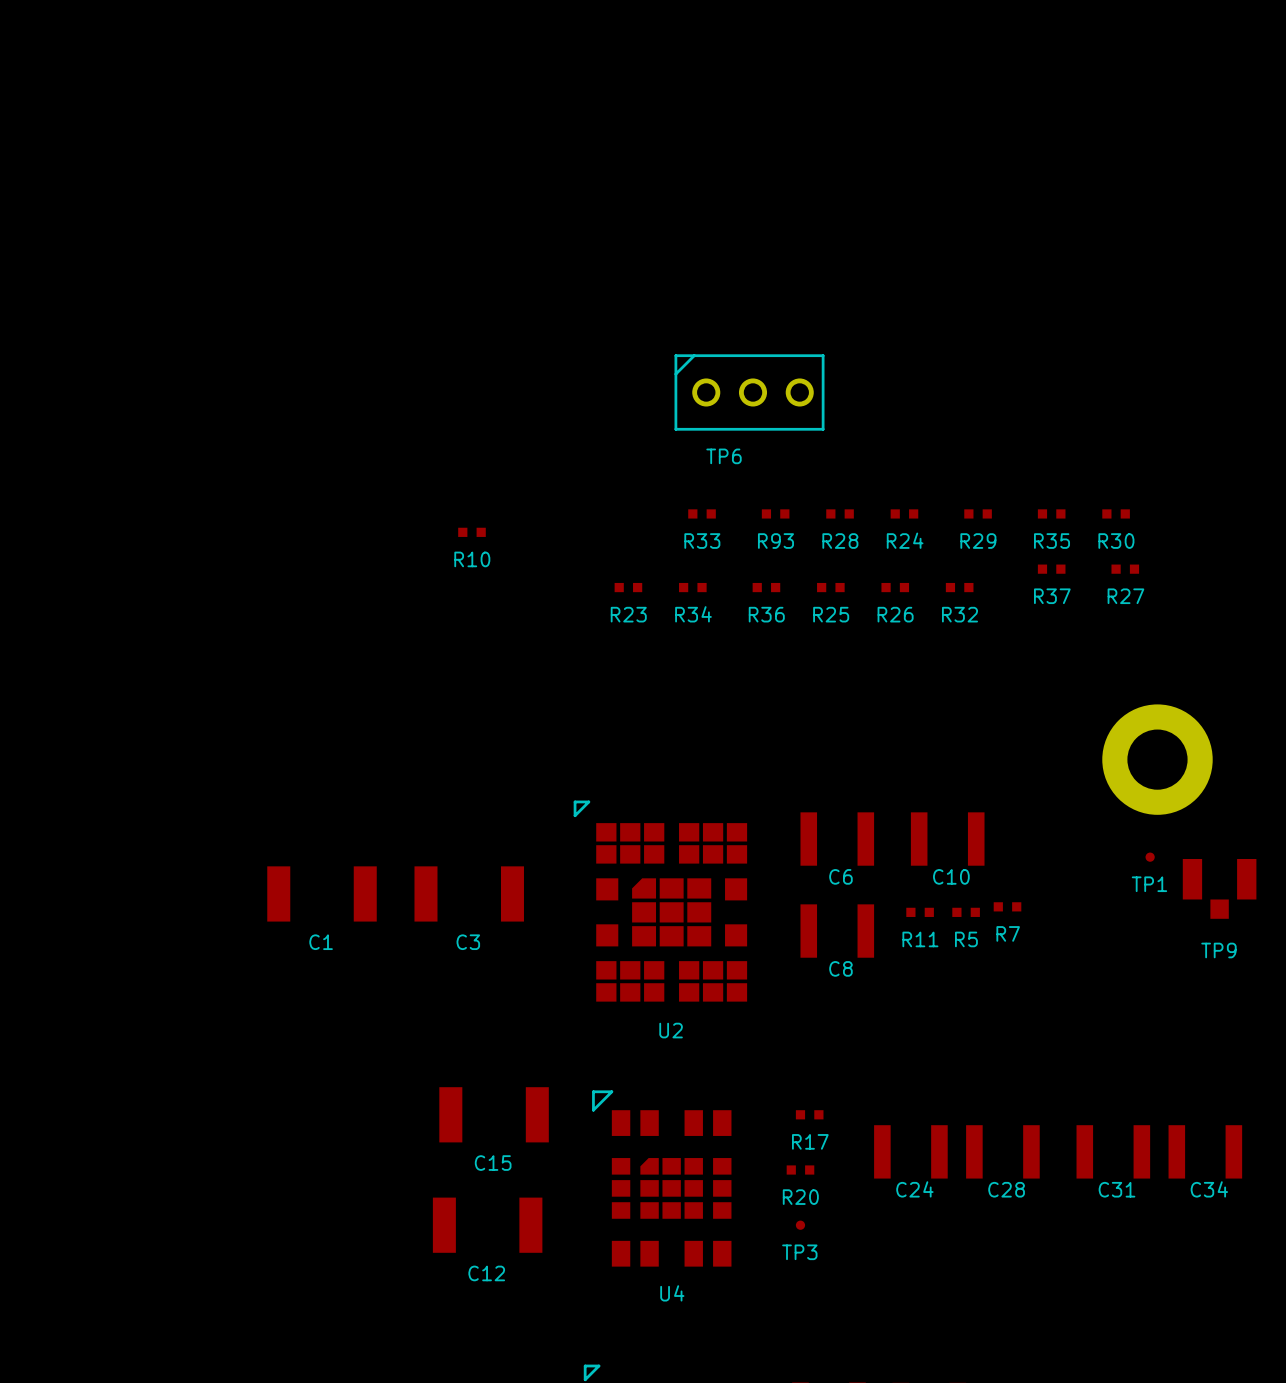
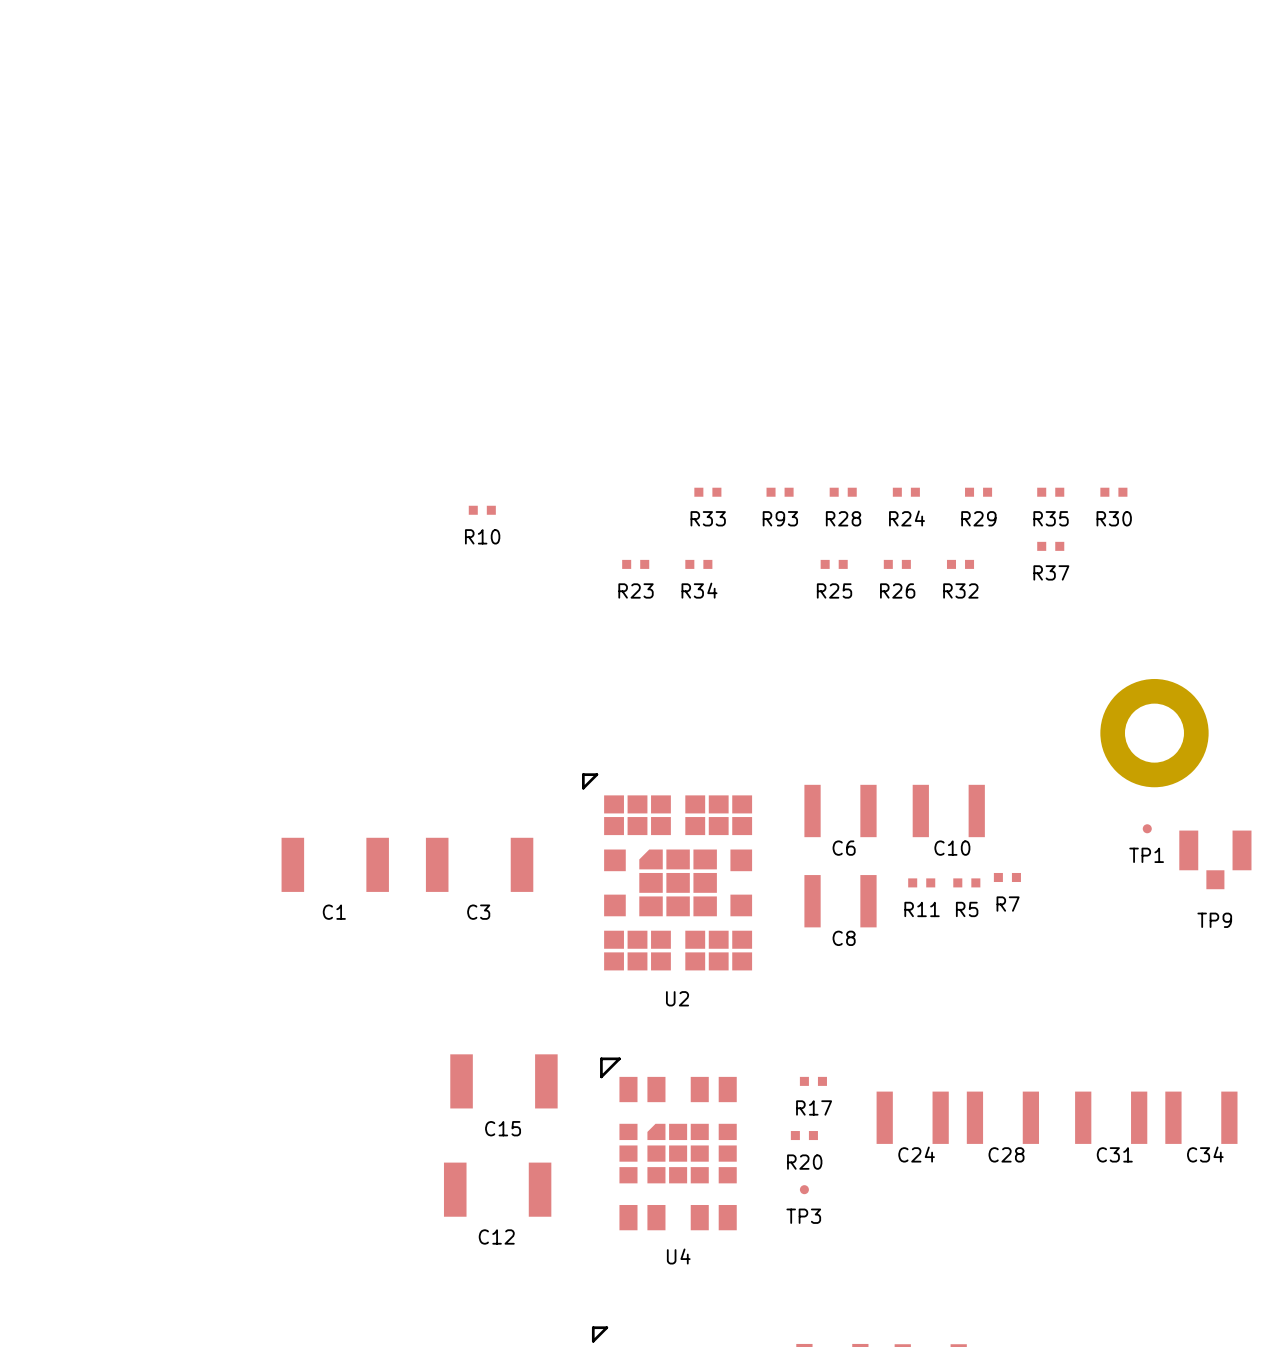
TP6: (749, 392) -> none
R27: (1125, 569) -> none
R36: (766, 587) -> none

